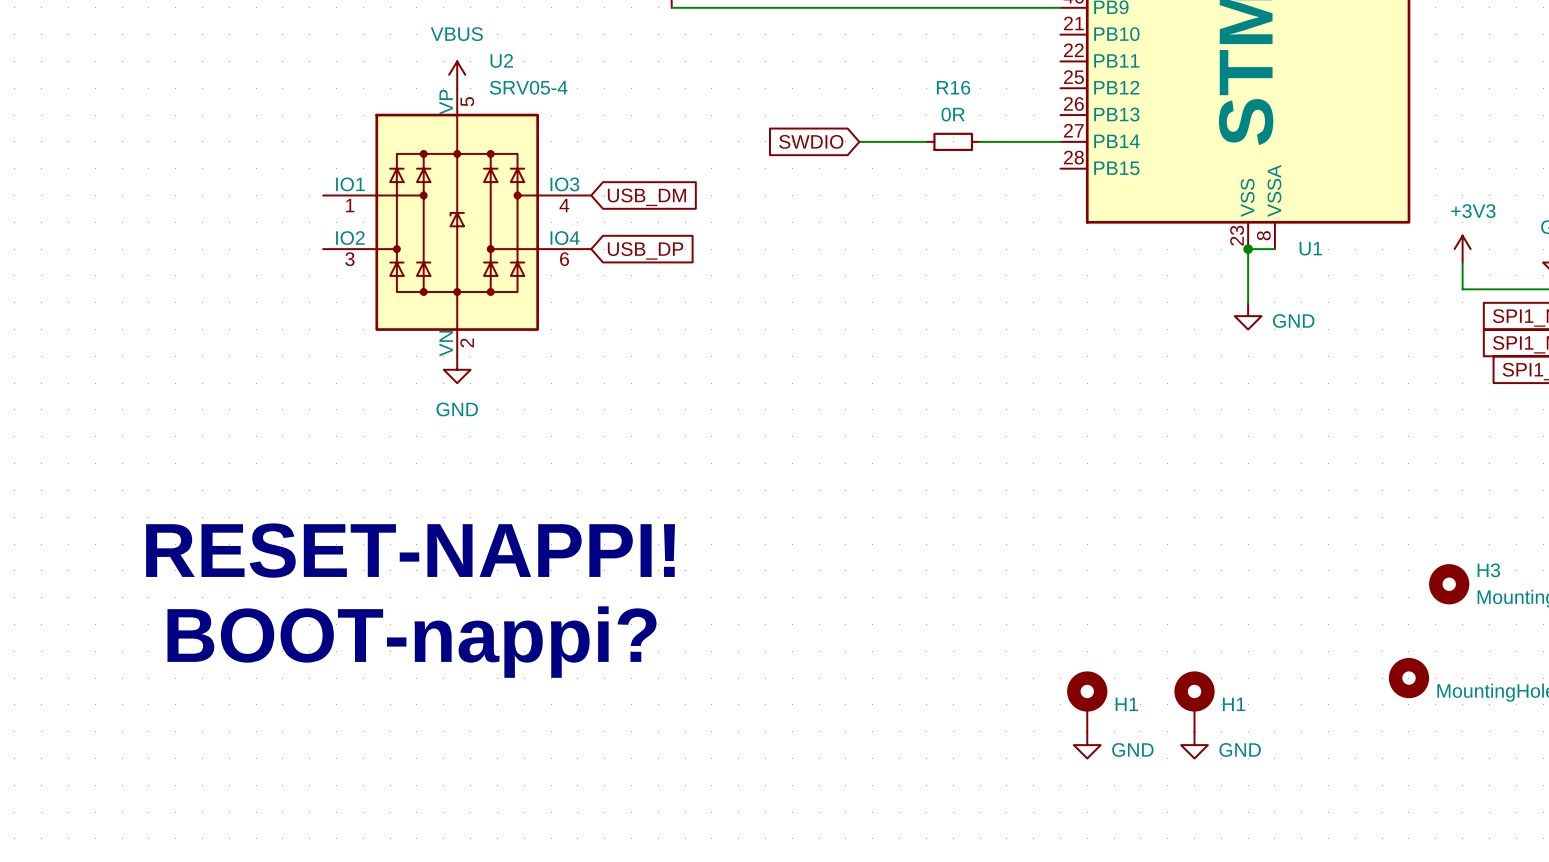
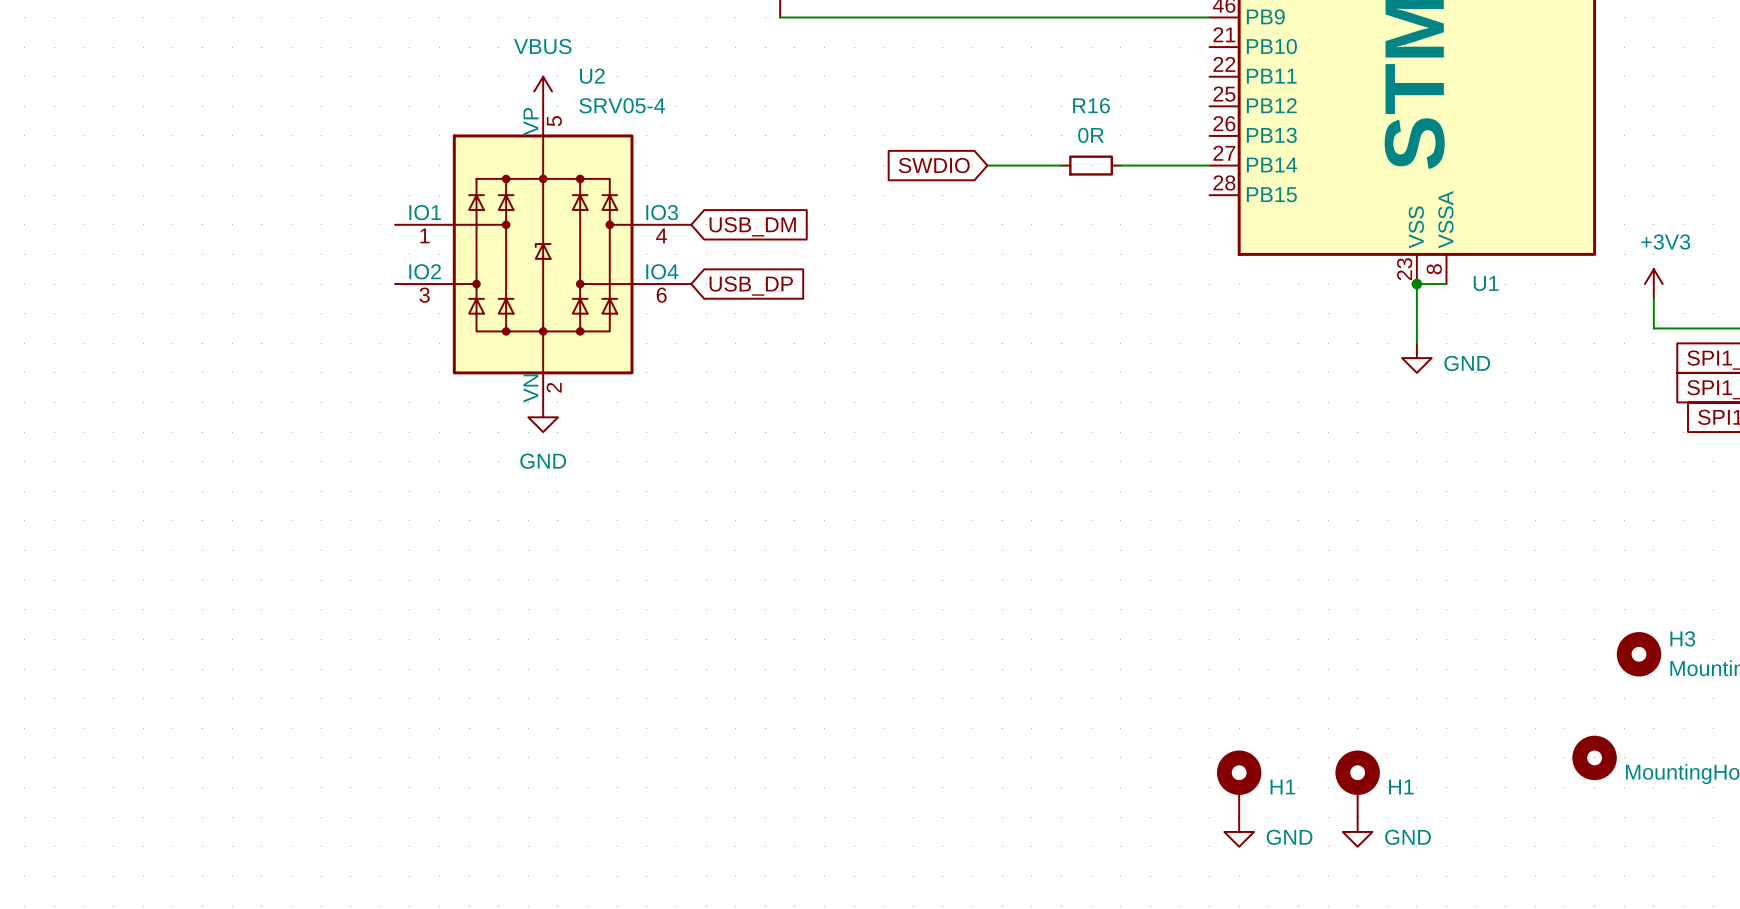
text: RESET-NAPPI! (410, 550) -> none
text: BOOT-nappi? (411, 642) -> none

